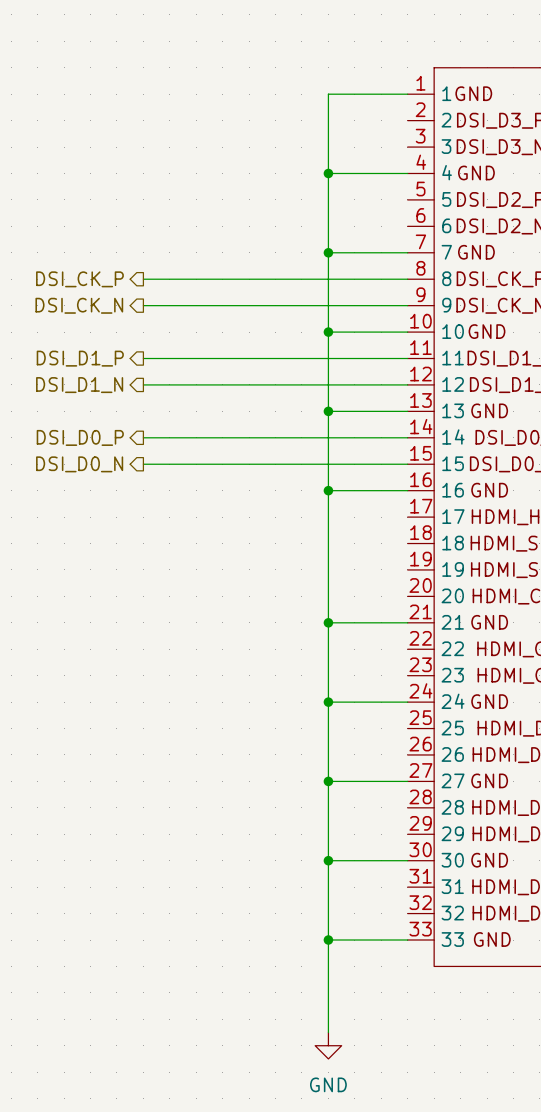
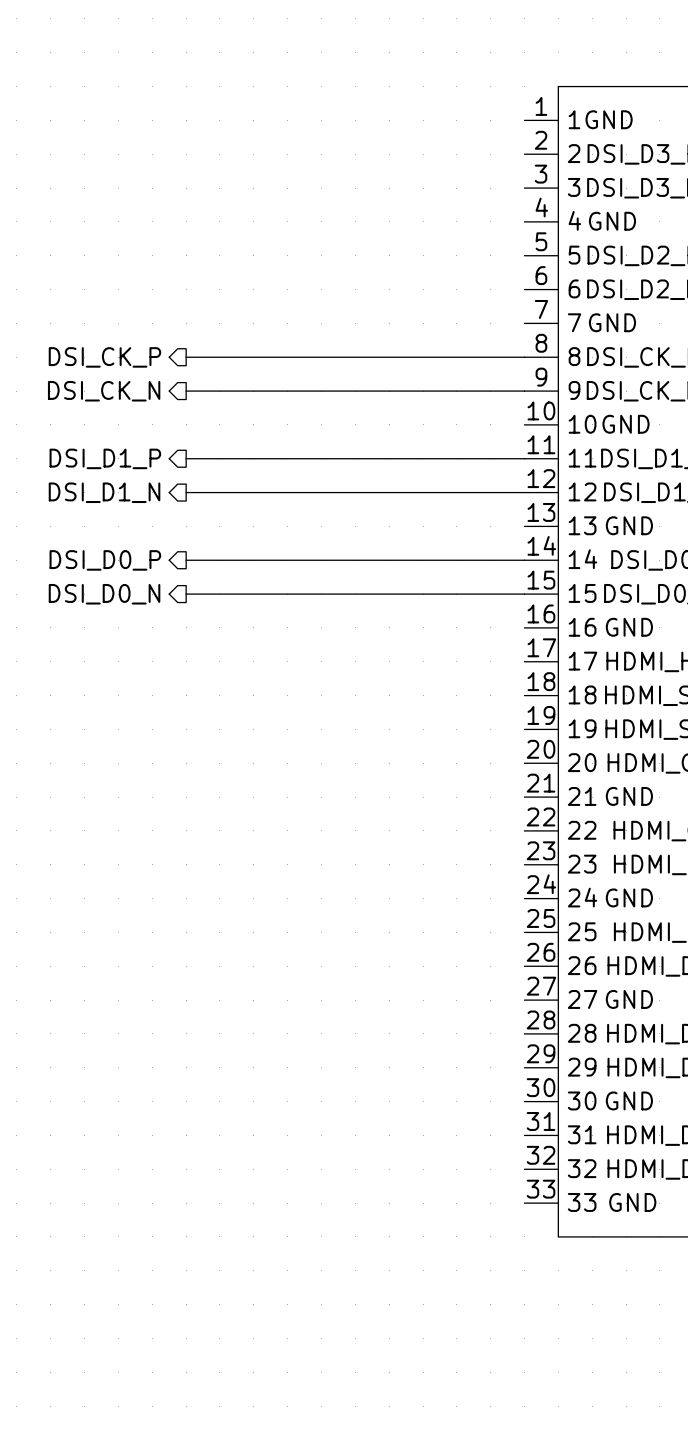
wire: (407, 94) (328, 94) (328, 1032) -> none
wire: (328, 173) (407, 173) -> none
junction: (328, 173) -> none
wire: (328, 252) (407, 252) -> none
junction: (328, 252) -> none
wire: (328, 332) (407, 332) -> none
junction: (328, 332) -> none
wire: (328, 411) (407, 411) -> none
junction: (328, 411) -> none
wire: (328, 490) (407, 490) -> none
junction: (328, 490) -> none
wire: (328, 622) (407, 622) -> none
junction: (328, 622) -> none
wire: (328, 702) (407, 702) -> none
junction: (328, 702) -> none
wire: (328, 781) (407, 781) -> none
junction: (328, 781) -> none
wire: (328, 860) (407, 860) -> none
junction: (328, 860) -> none
wire: (328, 940) (407, 940) -> none
junction: (328, 940) -> none
power symbol: GND (328, 1045) -> none

